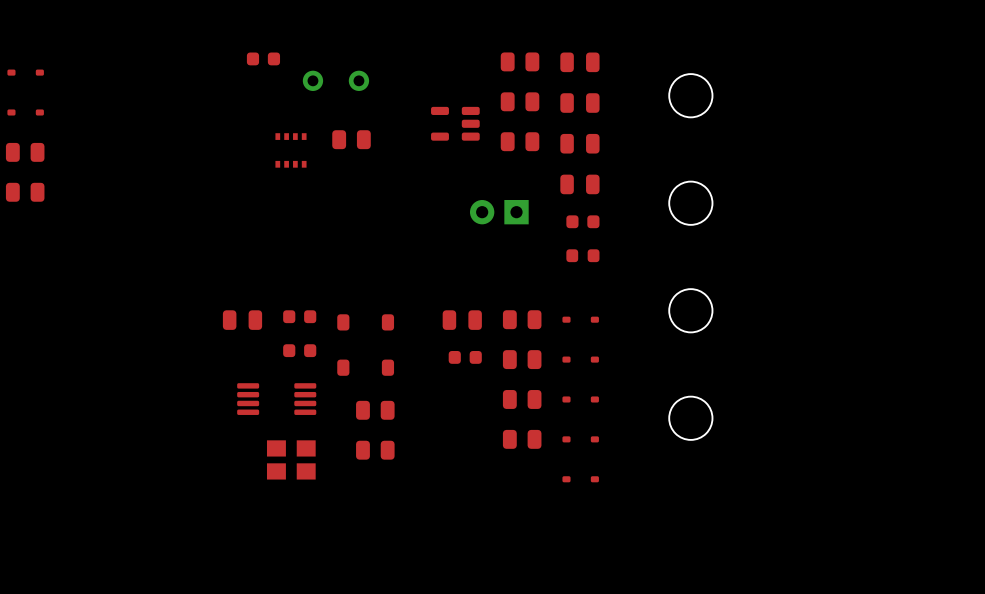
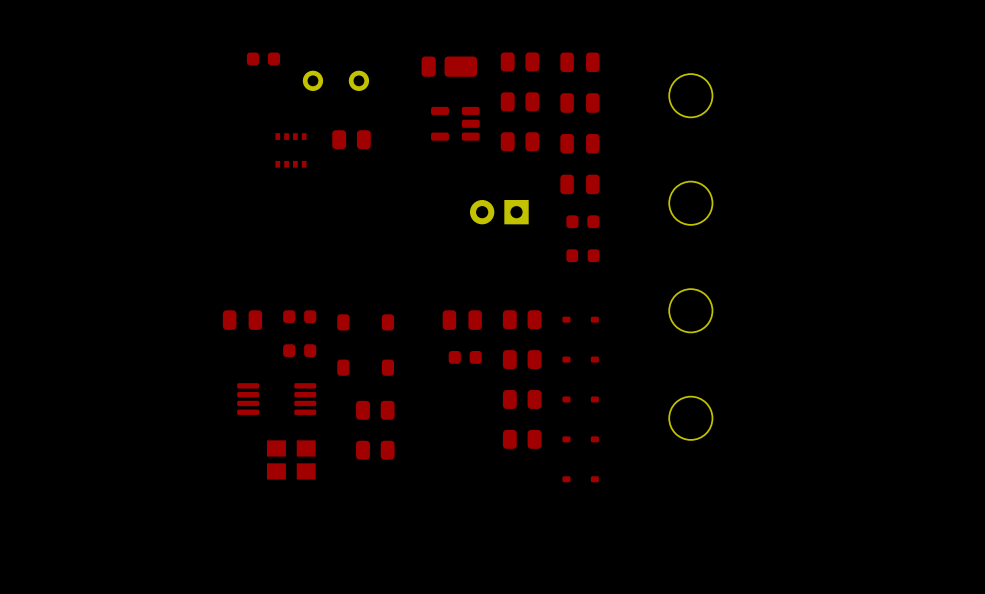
part: none -> (449, 66)
part: (25, 72) -> none
part: (25, 112) -> none
part: (25, 152) -> none
part: (25, 192) -> none

